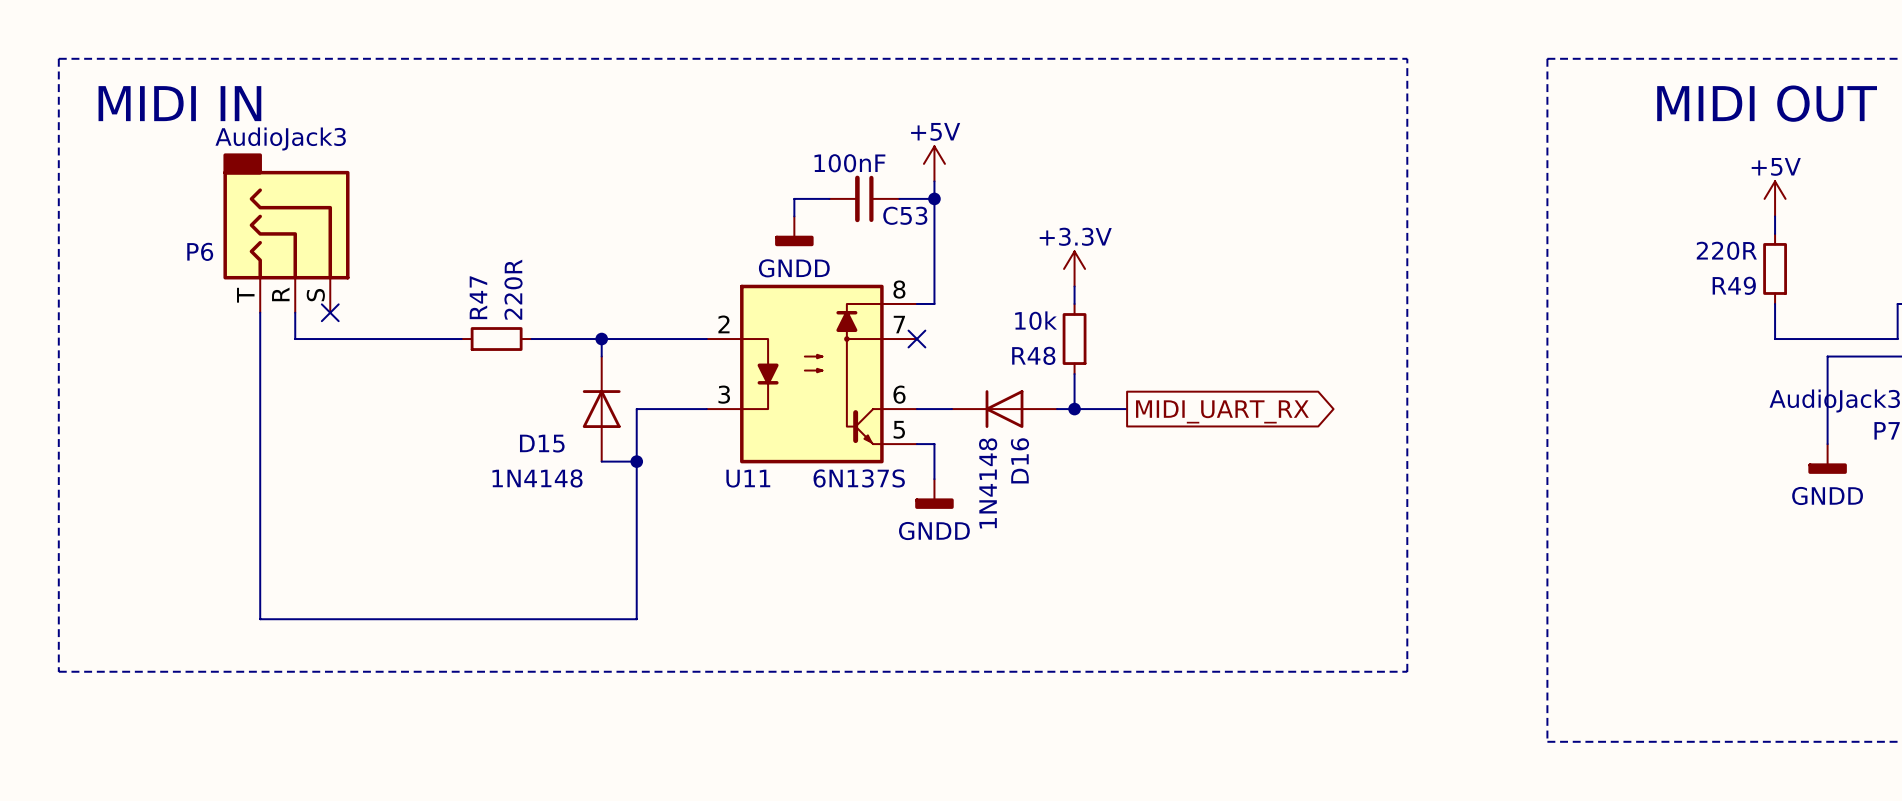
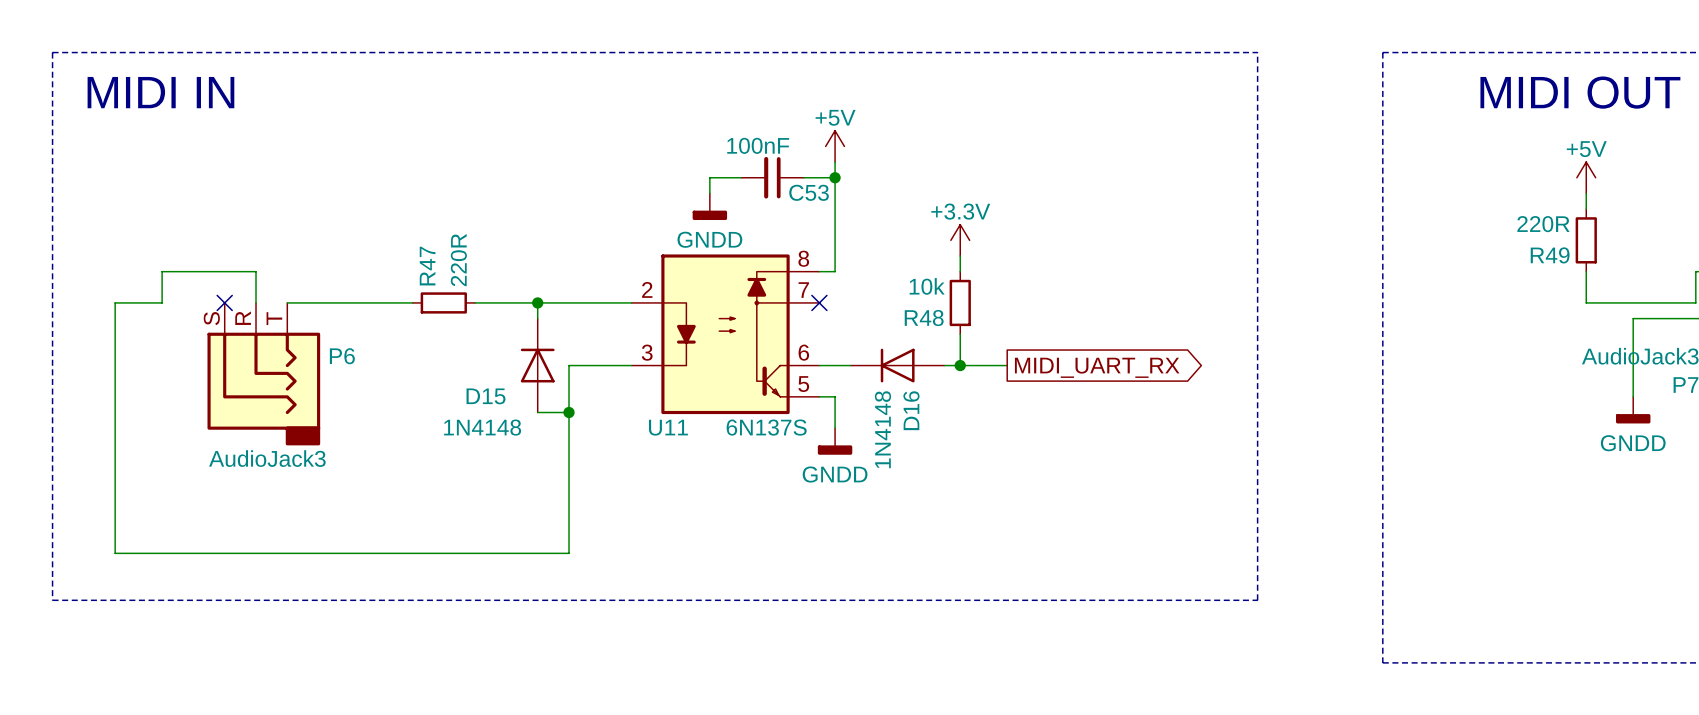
P6 rotation: 0° (286, 216) -> 180° (263, 389)
P6 position: (286, 233) -> (263, 374)
wire: (260, 312) (260, 619) -> (256, 302) (256, 271) (162, 271) (162, 302) (115, 302) (115, 553) (232, 553)
wire: (295, 312) (295, 339) (321, 339) -> none
no-connect mark: (330, 312) -> none
no-connect mark: none -> (224, 302)

